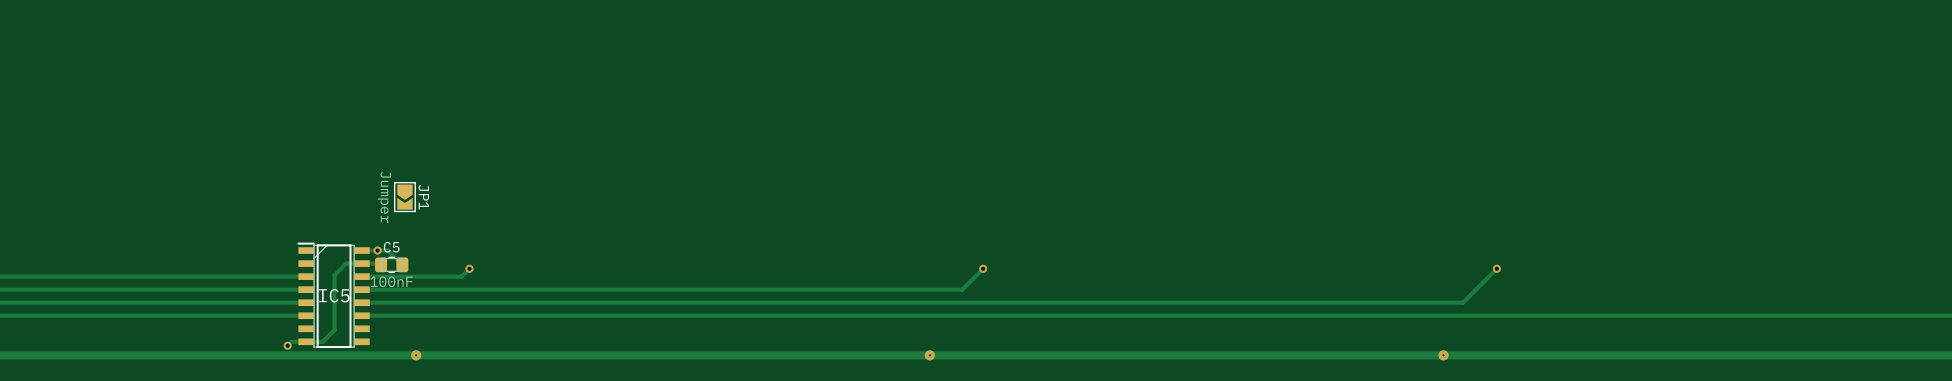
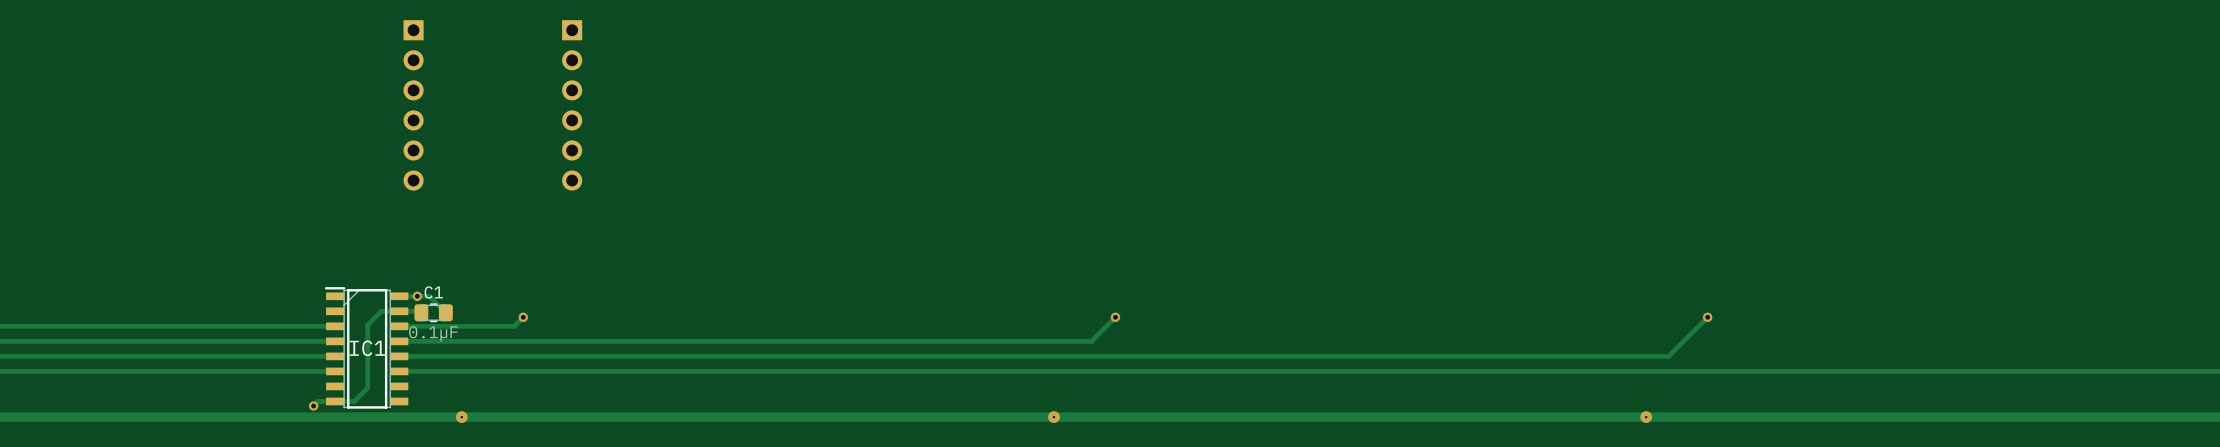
part: none -> (413, 105)
part: none -> (572, 105)
JP1: Jumper (404, 197) -> none
C5 name: C5 (391, 247) -> C1 (433, 292)
C5 value: 100nF (391, 281) -> 0.1µF (433, 333)
IC5 name: IC5 (334, 295) -> IC1 (367, 348)

